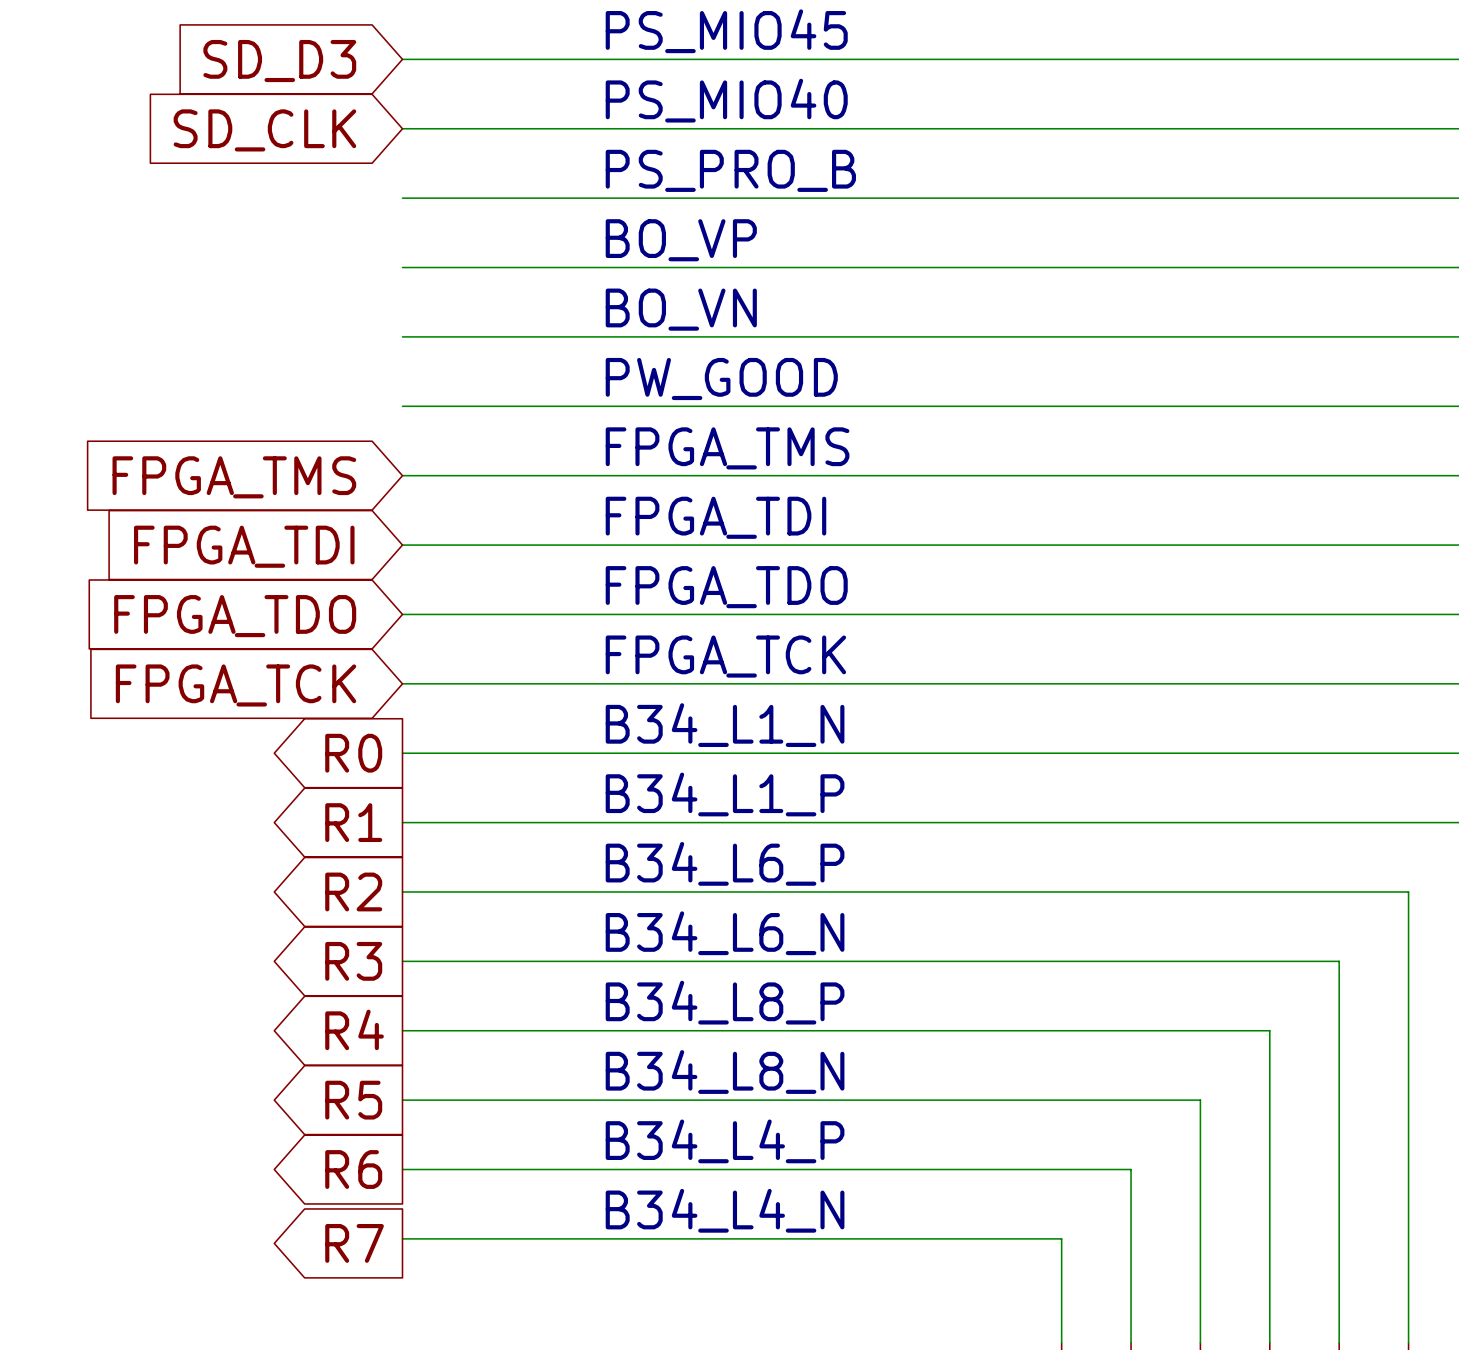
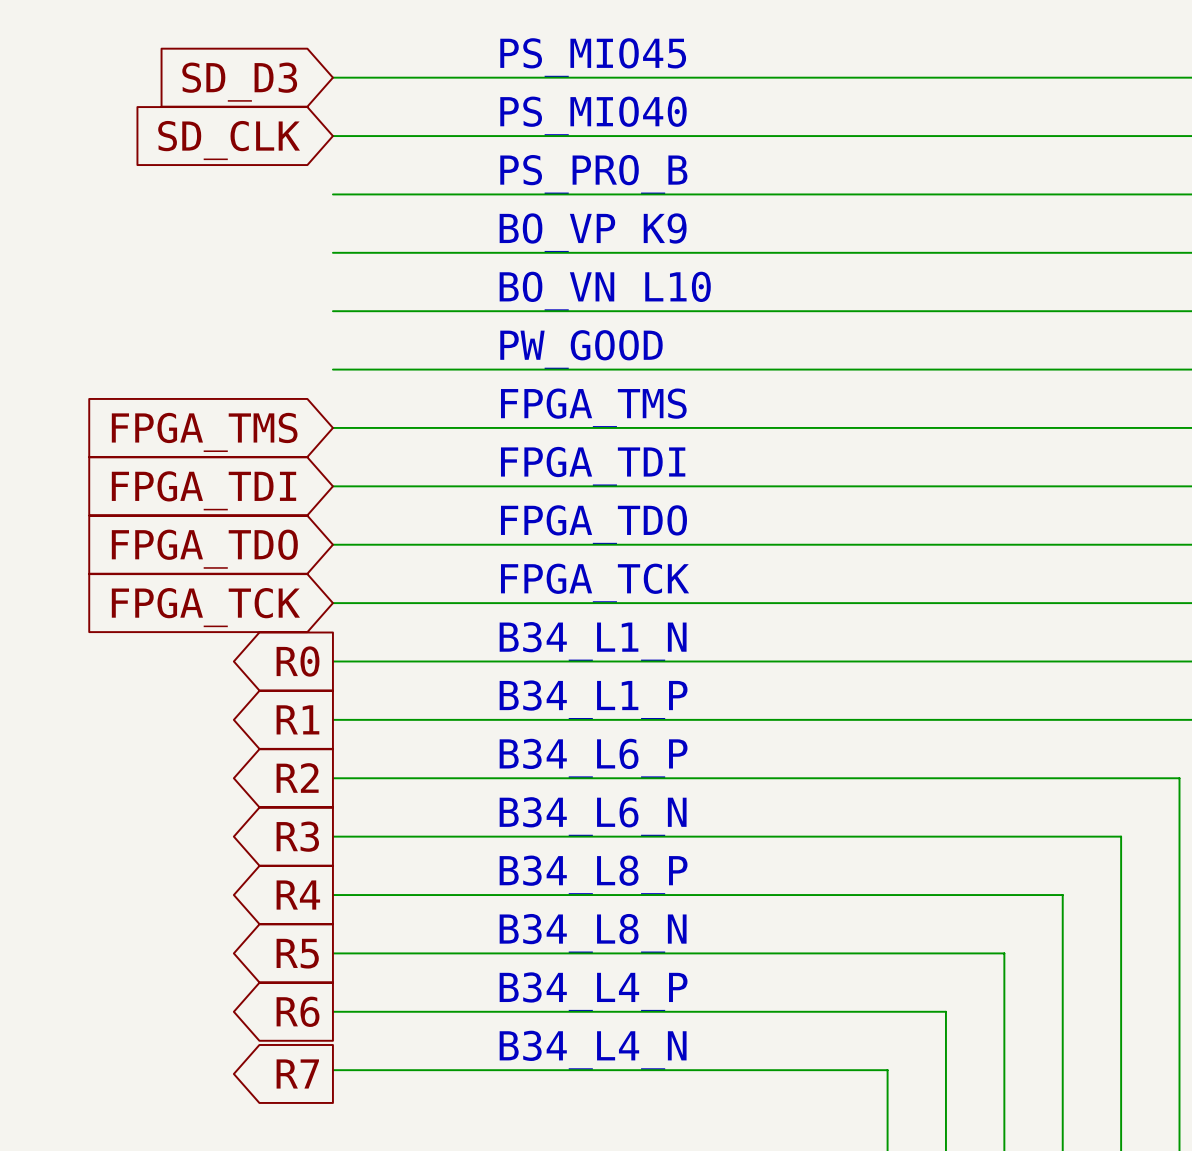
text: BO_VP (681, 240) -> BO_VP K9 (593, 232)
text: BO_VN (681, 309) -> BO_VN L10 (605, 291)

